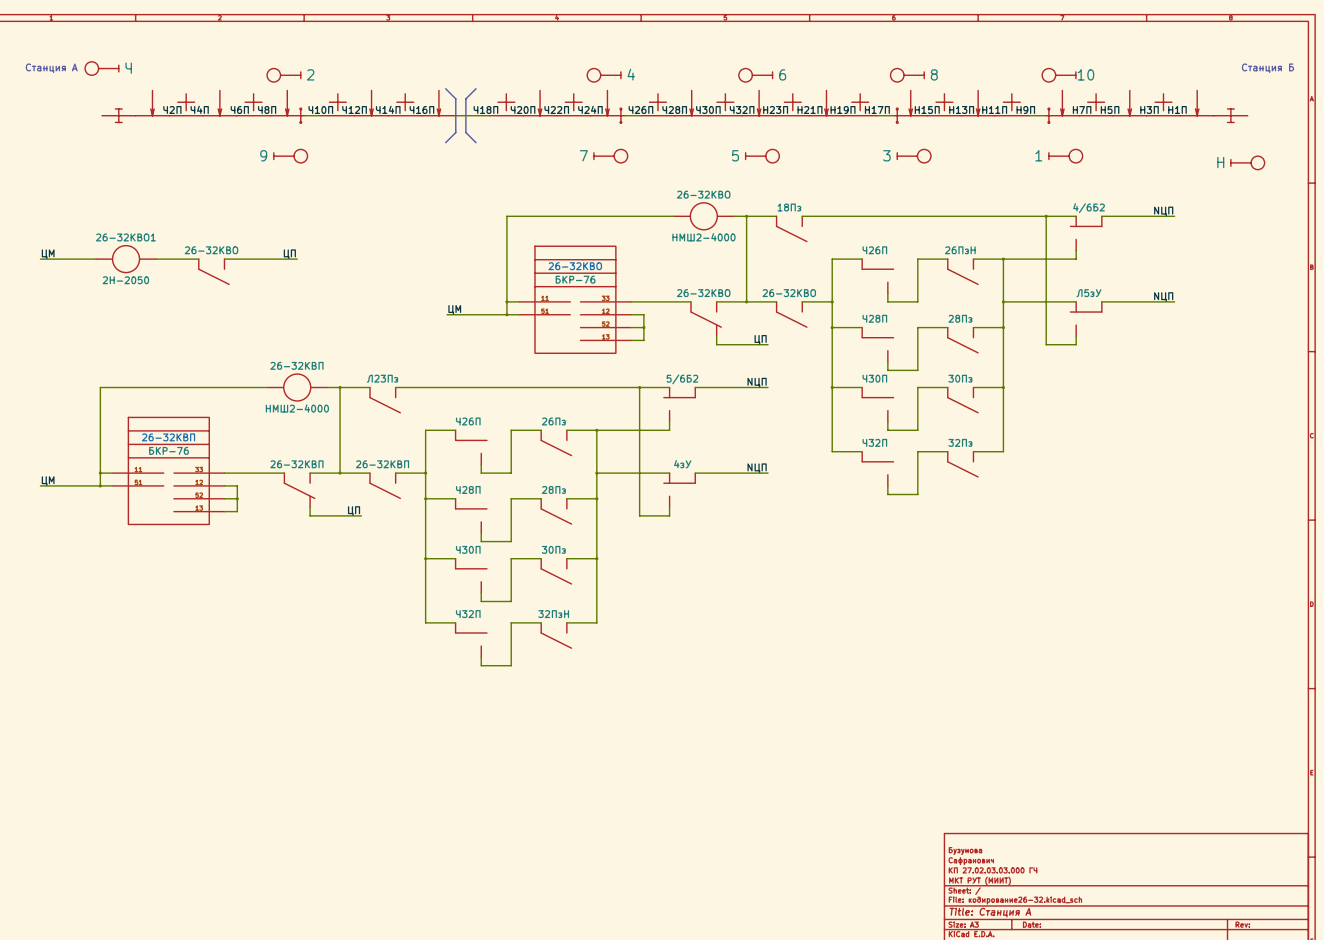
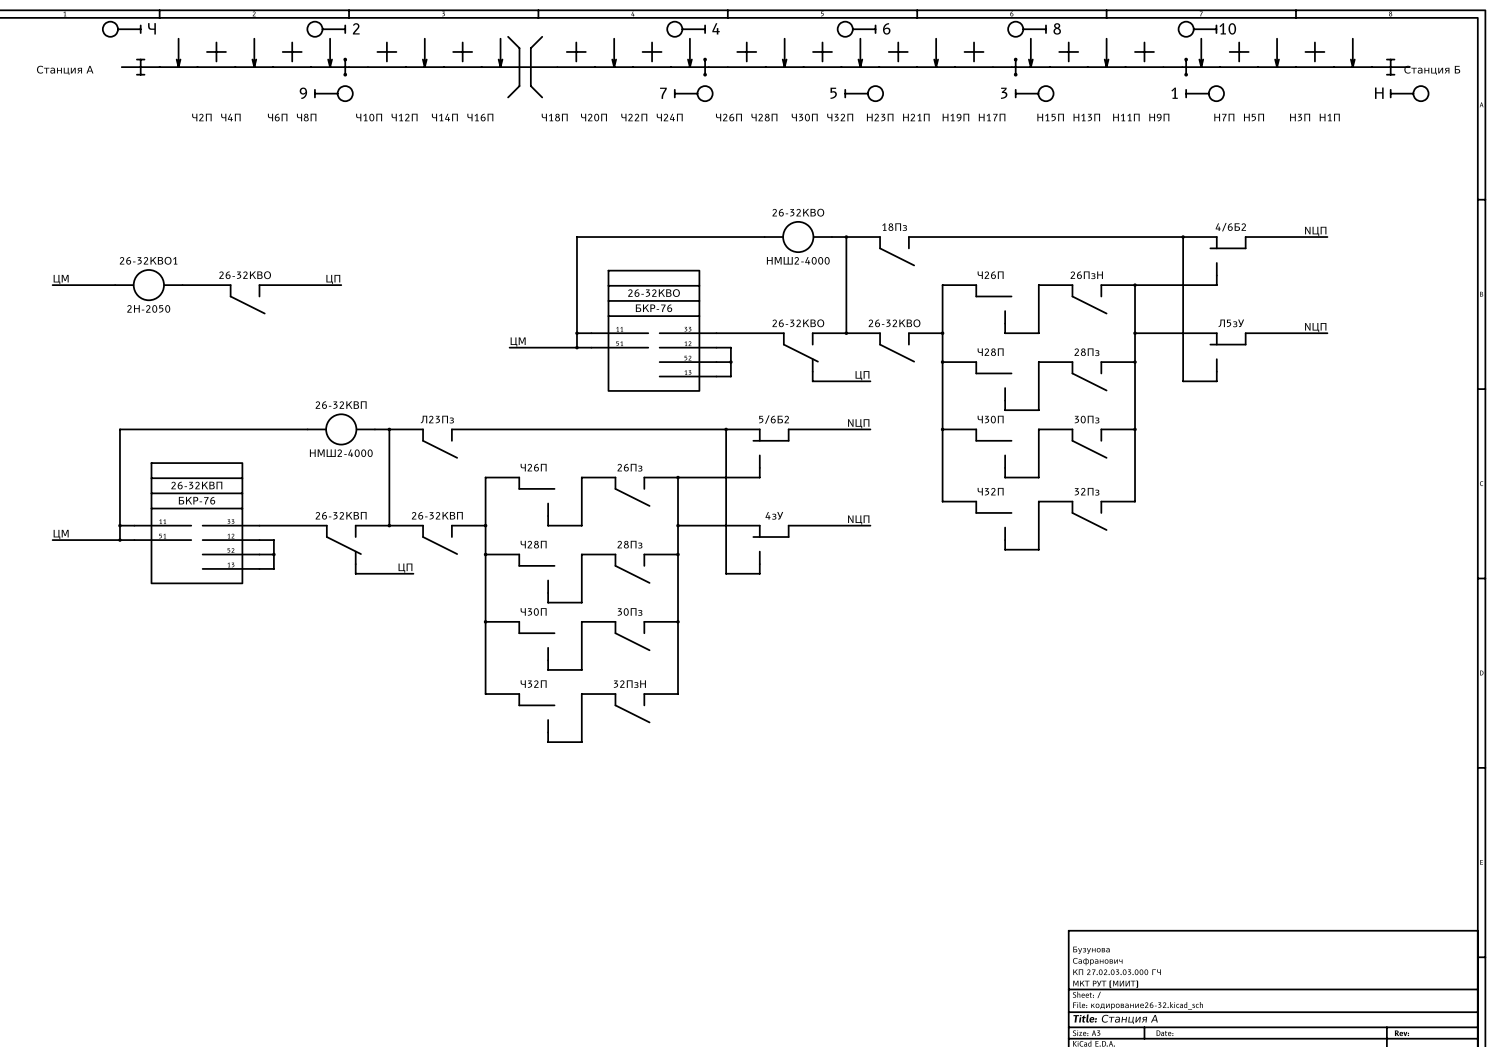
part: none -> (178, 52)
part: none -> (254, 52)
part: none -> (330, 52)
part: none -> (424, 52)
part: none -> (500, 52)
part: none -> (614, 52)
part: none -> (689, 52)
part: none -> (784, 52)
part: none -> (860, 52)
part: none -> (936, 52)
part: none -> (1030, 52)
part: none -> (1106, 52)
part: none -> (1201, 52)
part: none -> (1277, 52)
part: none -> (1352, 52)
part: none -> (216, 54)
part: none -> (292, 54)
part: none -> (386, 54)
part: none -> (462, 54)
part: none -> (576, 54)
part: none -> (652, 54)
part: none -> (746, 54)
part: none -> (822, 54)
part: none -> (898, 54)
part: none -> (974, 54)
part: none -> (1068, 54)
part: none -> (1144, 54)
part: none -> (1239, 54)
part: none -> (1314, 54)
part position: (101, 68) -> (121, 29)
part position: (283, 75) -> (326, 29)
part position: (604, 75) -> (686, 29)
part position: (755, 75) -> (856, 29)
part position: (907, 75) -> (1027, 29)
part position: (1059, 75) -> (1197, 29)
line: (445, 88) (455, 98) (455, 132) (445, 142) -> (508, 36) (519, 48) (519, 86) (508, 97)
line: (476, 88) (465, 98) (465, 132) (476, 142) -> (542, 36) (530, 48) (530, 86) (542, 97)
part: (152, 103) -> none
part: (219, 103) -> none
part: (287, 103) -> none
part: (371, 103) -> none
part: (438, 103) -> none
part: (540, 103) -> none
part: (607, 103) -> none
part: (691, 103) -> none
part: (759, 103) -> none
part: (826, 103) -> none
part: (910, 103) -> none
part: (978, 103) -> none
part: (1062, 103) -> none
part: (1129, 103) -> none
part: (1197, 103) -> none
part: (186, 104) -> none
part: (253, 104) -> none
part: (337, 104) -> none
part: (405, 104) -> none
part: (506, 104) -> none
part: (573, 104) -> none
part: (657, 104) -> none
part: (725, 104) -> none
part: (792, 104) -> none
part: (860, 104) -> none
part: (944, 104) -> none
part: (1011, 104) -> none
part: (1096, 104) -> none
part: (1163, 104) -> none
part position: (118, 115) -> (140, 67)
part position: (300, 115) -> (345, 67)
wire: (304, 115) (320, 115) -> (349, 67) (367, 67)
wire: (455, 115) (489, 115) -> (519, 67) (557, 67)
part position: (620, 115) -> (705, 67)
wire: (624, 115) (641, 115) -> (708, 67) (727, 67)
wire: (877, 115) (893, 115) -> (992, 67) (1011, 67)
part position: (897, 115) -> (1015, 67)
wire: (1028, 115) (1045, 115) -> (1163, 67) (1182, 67)
part position: (1048, 115) -> (1186, 67)
part position: (1230, 115) -> (1390, 67)
part position: (290, 156) -> (333, 93)
part position: (610, 156) -> (693, 93)
part position: (762, 156) -> (864, 93)
part position: (914, 156) -> (1034, 93)
part position: (1065, 156) -> (1205, 93)
part position: (1247, 162) -> (1409, 93)

